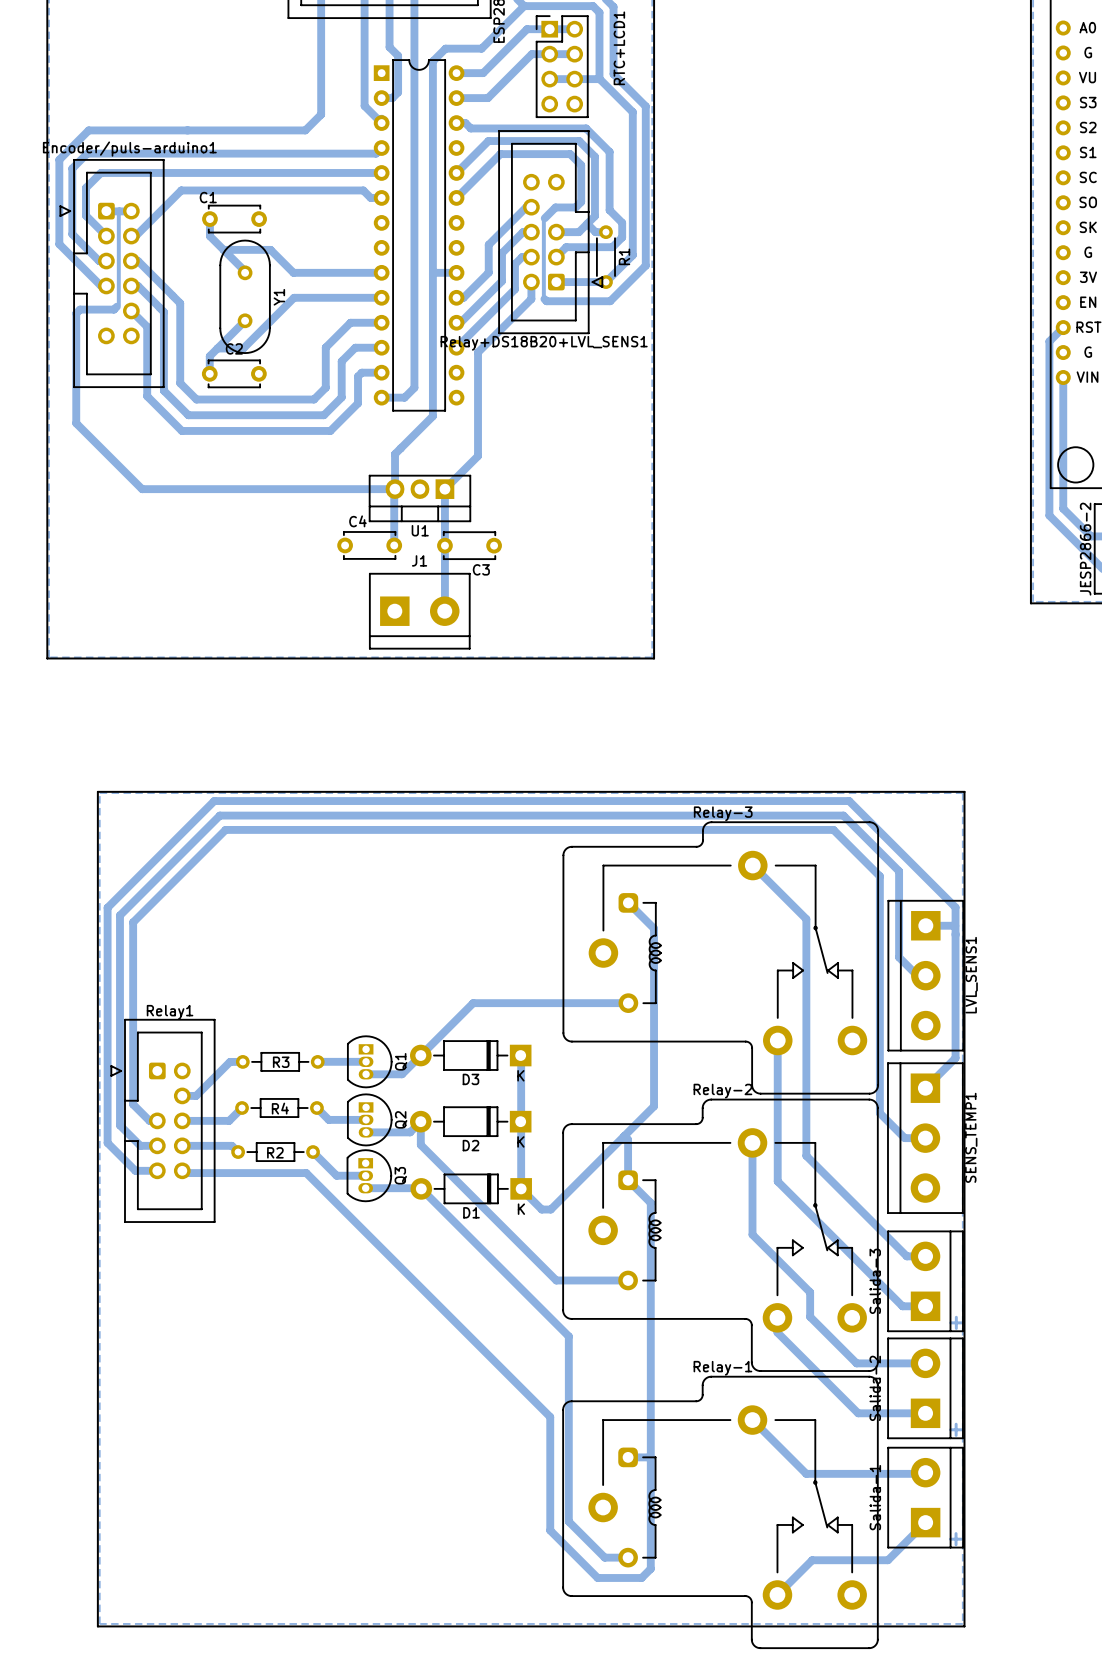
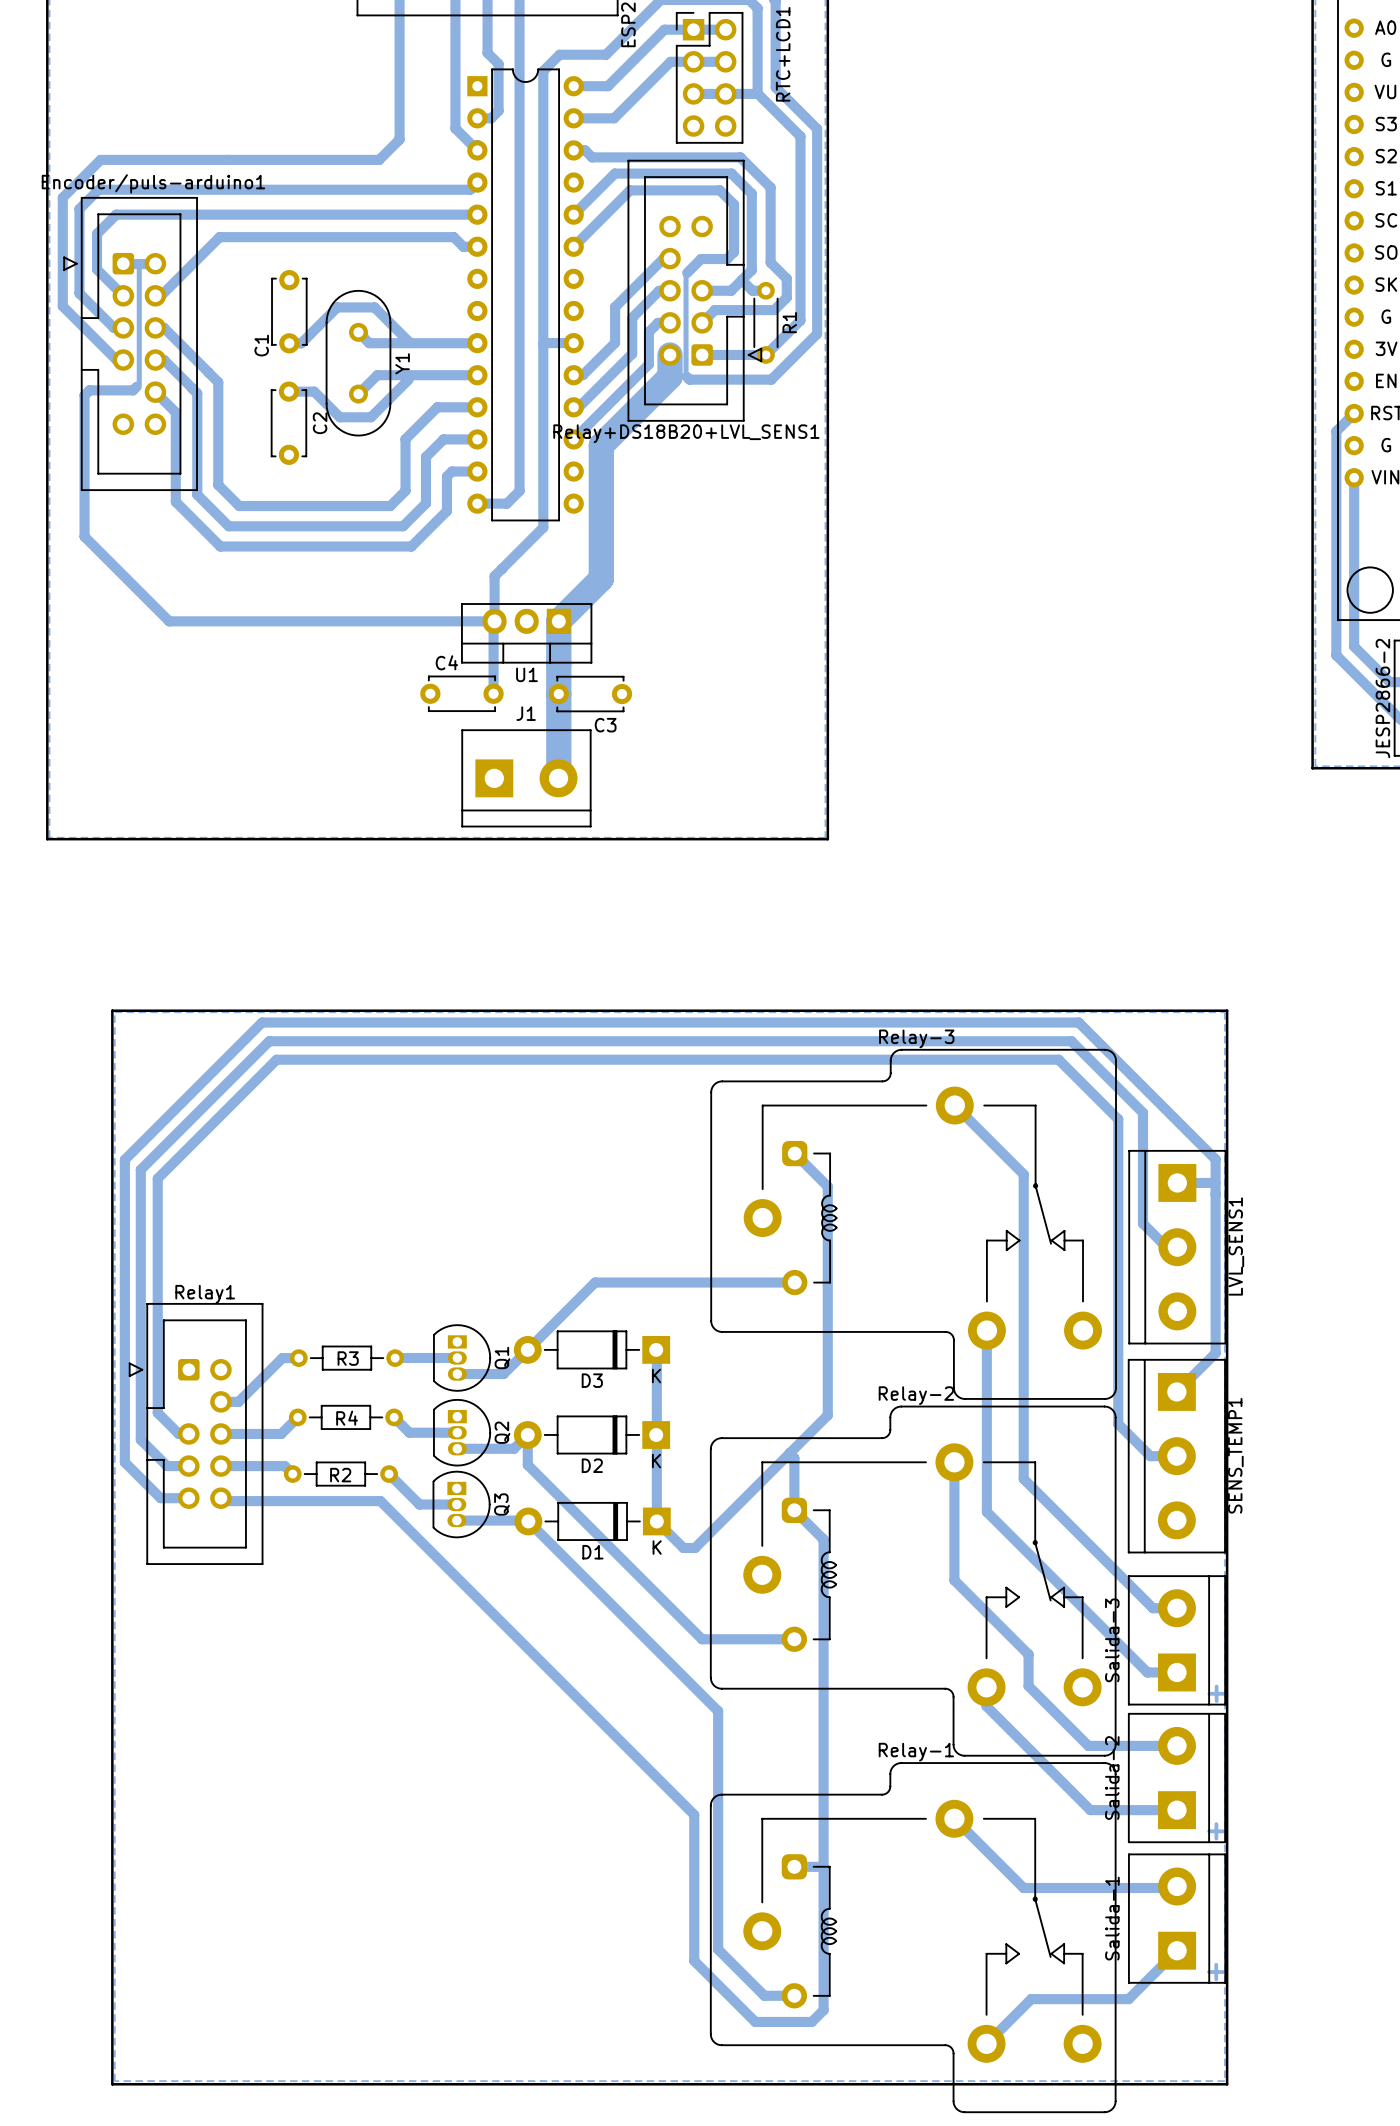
C1 name position: C1 (208, 197) -> C1 (261, 345)
bottom track: (209, 219) (209, 236) (245, 272) -> none
C1 rotation: 0° (234, 219) -> 90° clockwise (289, 311)
bottom track: (223, 249) (270, 249) (293, 272) (381, 272) -> (358, 332) (369, 343) (477, 343)
bottom track: none -> (409, 342) (374, 307) (337, 307) (301, 343) (289, 343)
bottom track width: thin (531, 282) (531, 299) (478, 352) (478, 456) (444, 489) (444, 611) -> thick (670, 354) (670, 376) (601, 445) (601, 578) (558, 621) (558, 778)
Y1 position: (245, 296) -> (358, 363)
bottom track: (303, 297) (294, 297) (243, 348) (217, 348) -> (377, 375) (358, 394)
bottom track: none -> (408, 379) (371, 417) (339, 417) (314, 391) (288, 391)
bottom track: (245, 320) (209, 356) (210, 374) -> none
C2 rotation: 0° (234, 373) -> 90° clockwise (288, 423)

